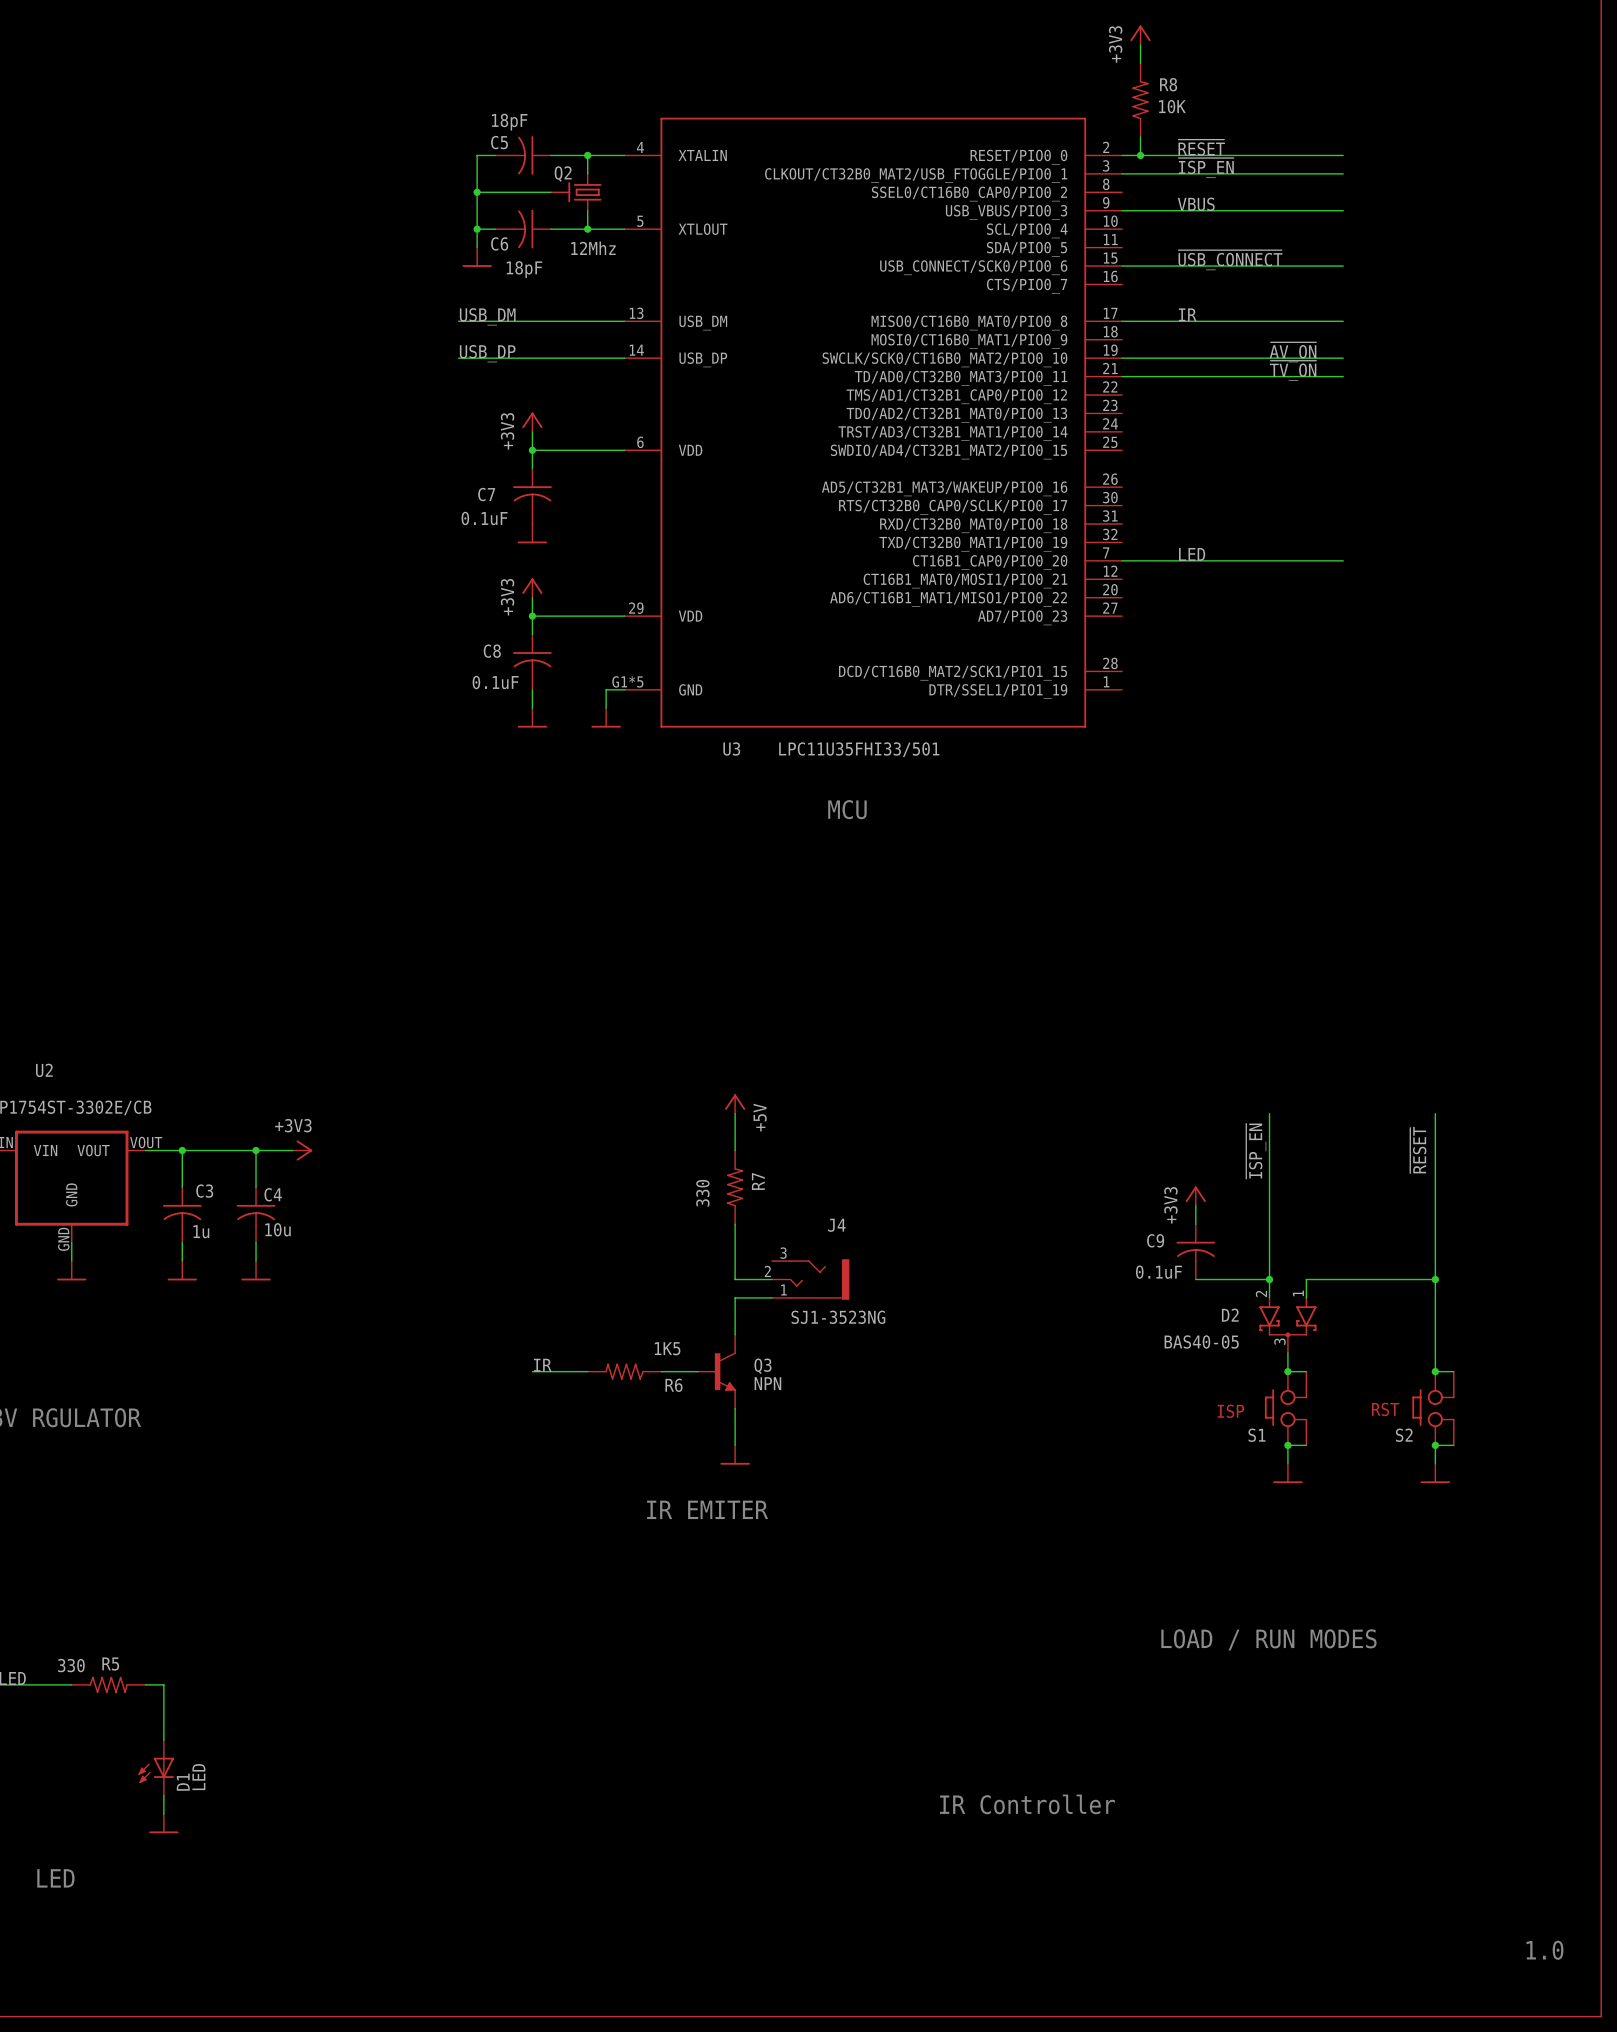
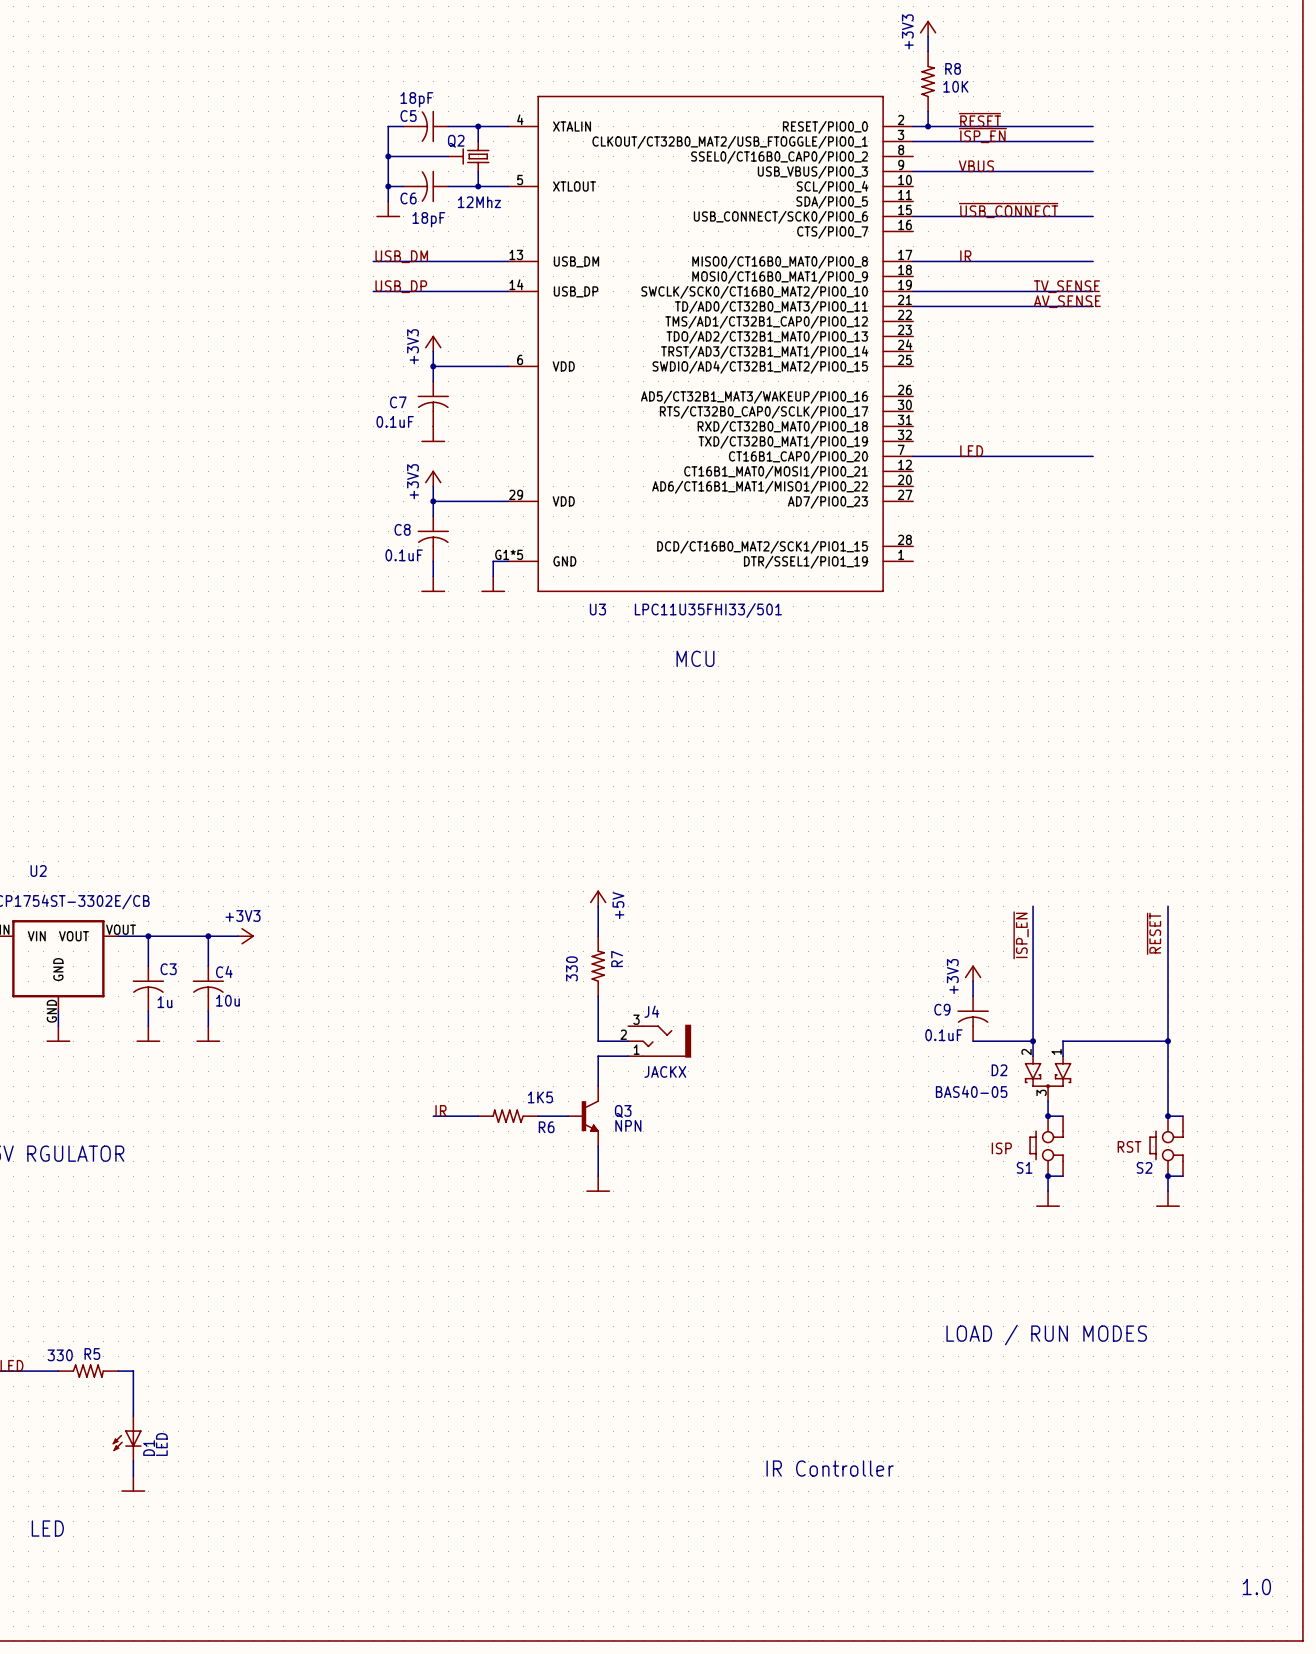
label: ~{AV_ON} (1293, 352) -> TV_SENSE (1066, 286)
label: ~{TV_ON} (1293, 370) -> AV_SENSE (1067, 301)
J4 name position: J4 (836, 1225) -> J4 (651, 1011)
J4 value: SJ1-3523NG (838, 1317) -> JACKX (665, 1071)
text: IR EMITER (707, 1509) -> none

